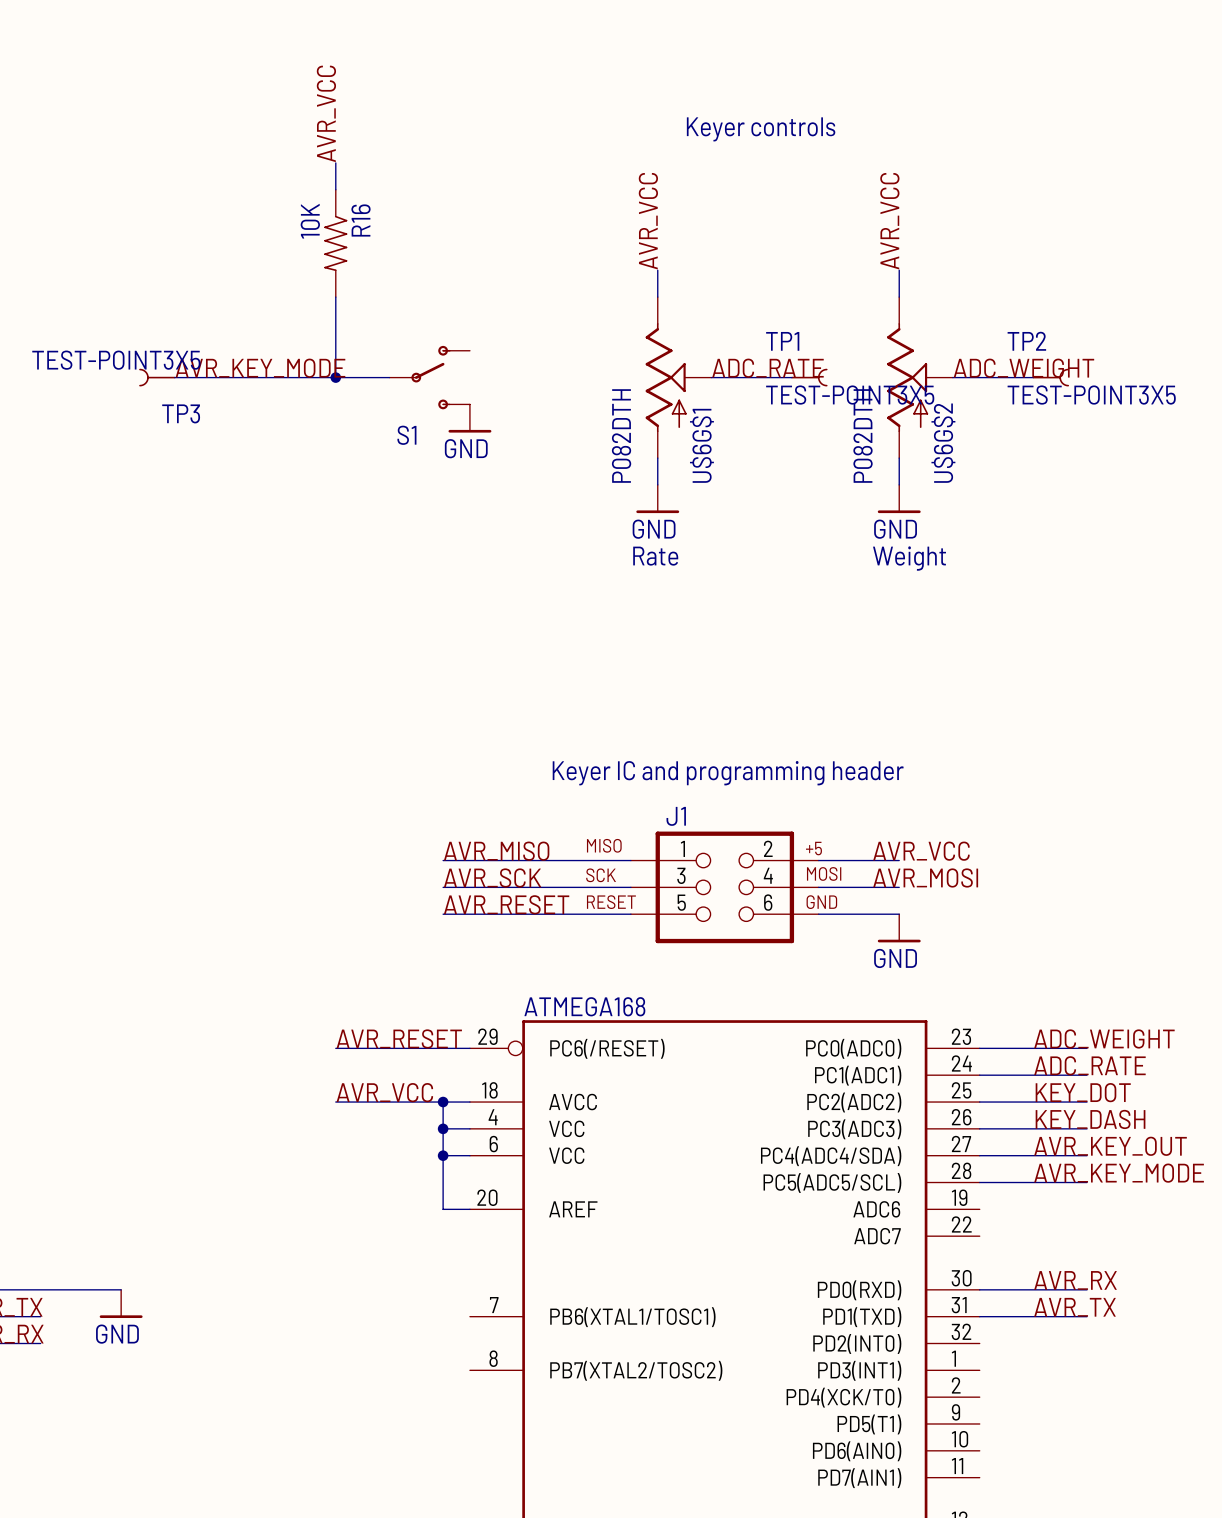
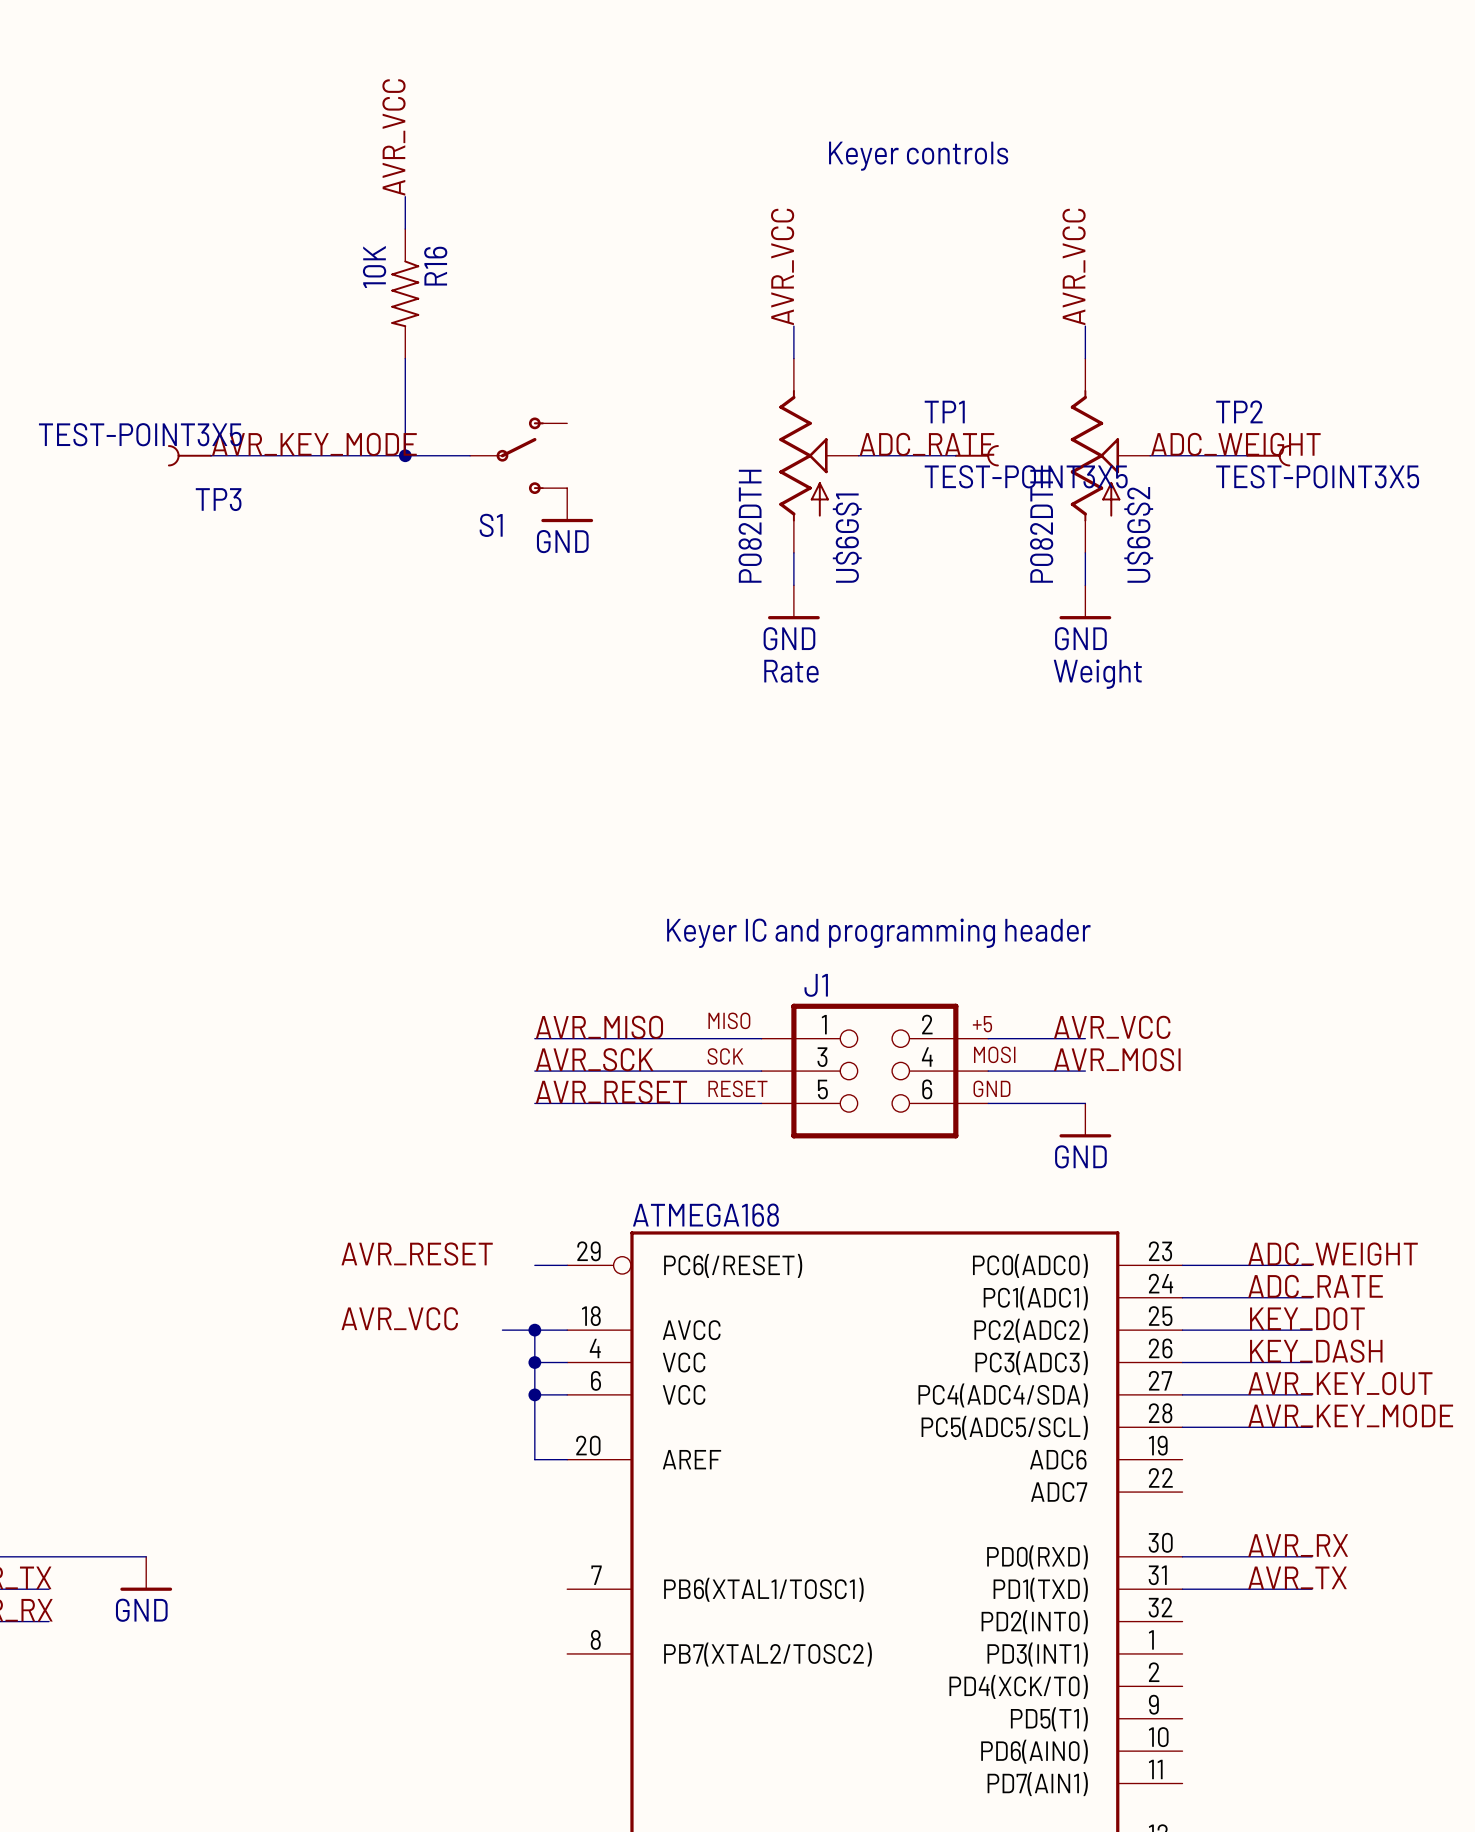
label position: AVR_RESET (399, 1038) -> AVR_RESET (417, 1254)
wire: (335, 1048) (443, 1048) -> none
label position: AVR_VCC (384, 1092) -> AVR_VCC (399, 1318)
wire: (335, 1102) (416, 1102) -> none

